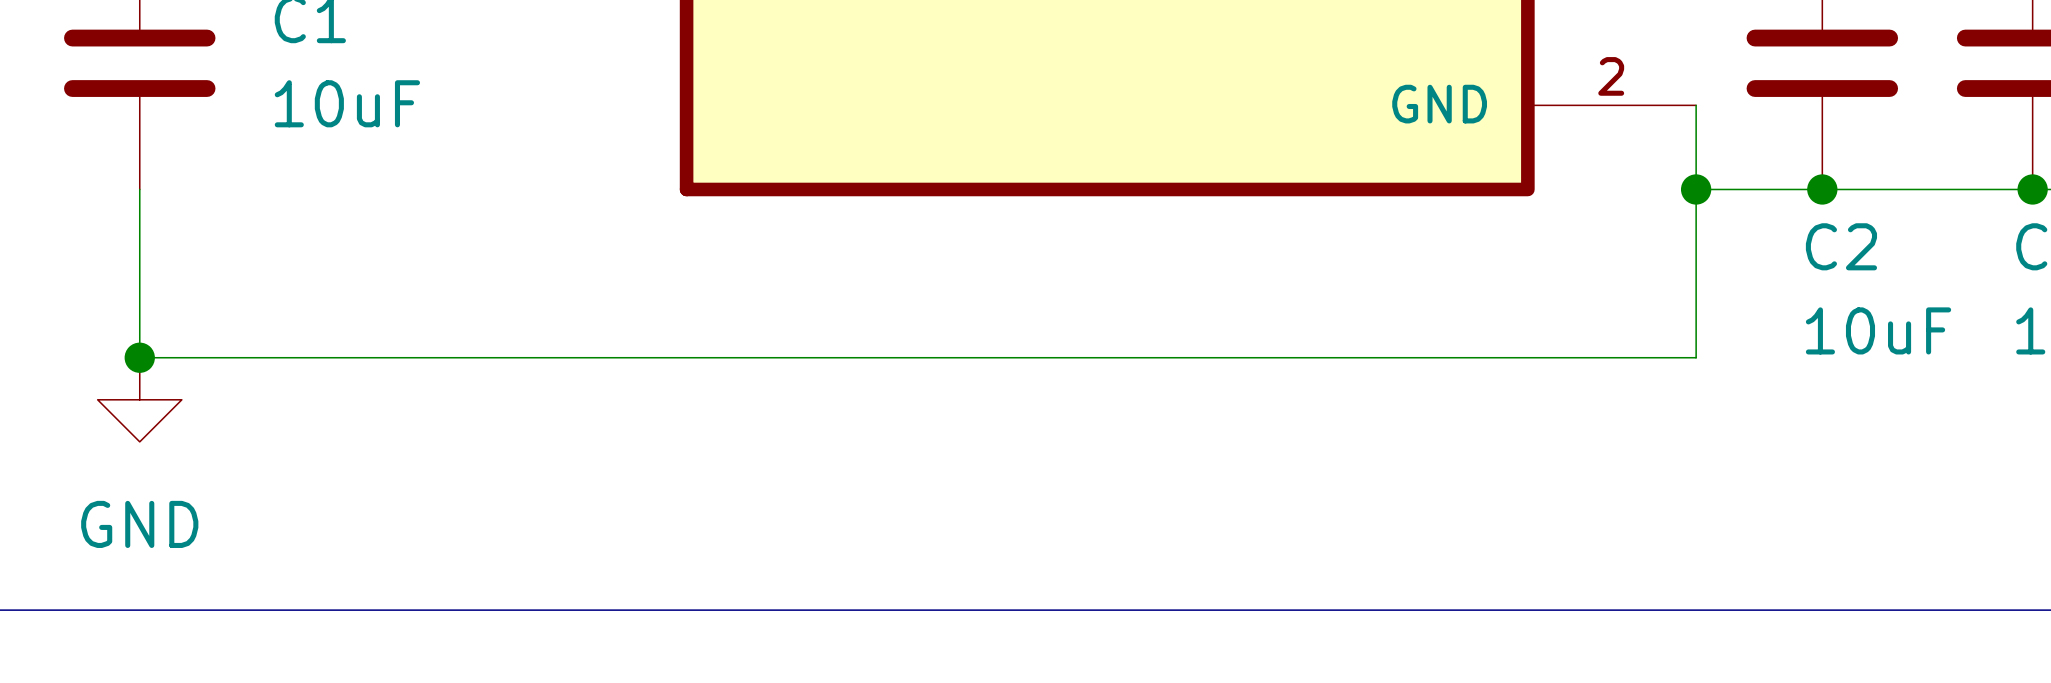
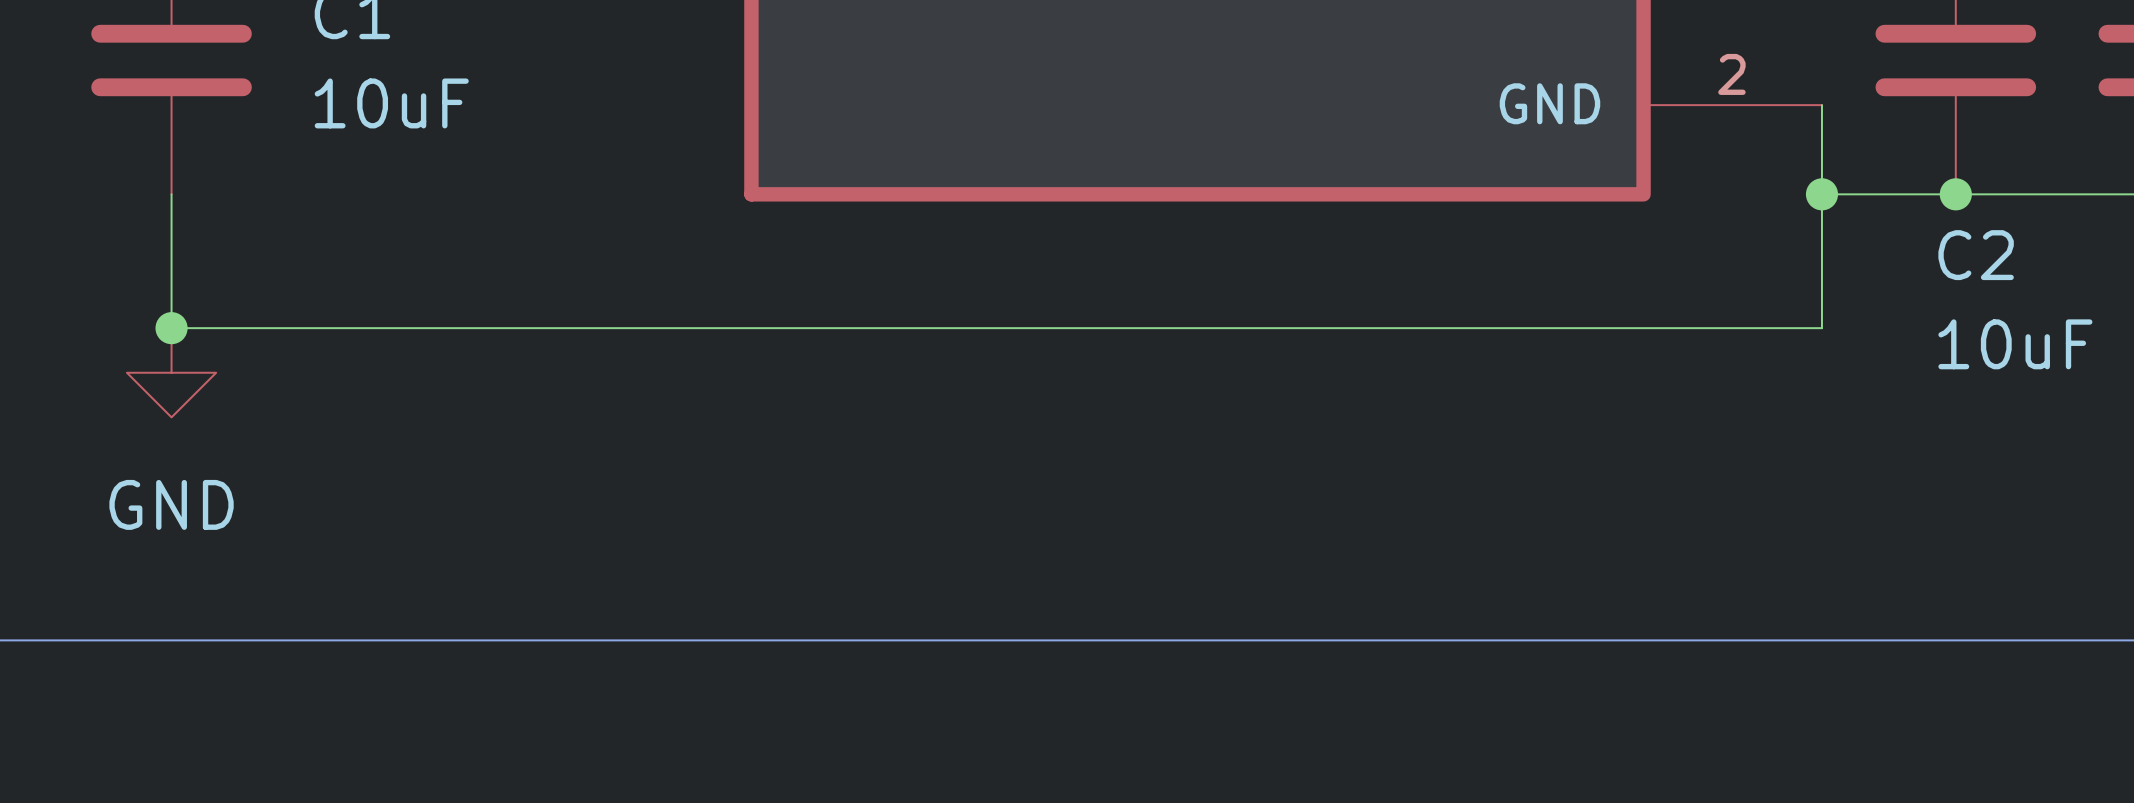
wire: (139, 315) (139, 357) (1696, 357) (1696, 315) -> (171, 328) (1821, 328)
junction position: (139, 357) -> (171, 328)
power symbol position: GND (139, 399) -> GND (171, 372)

